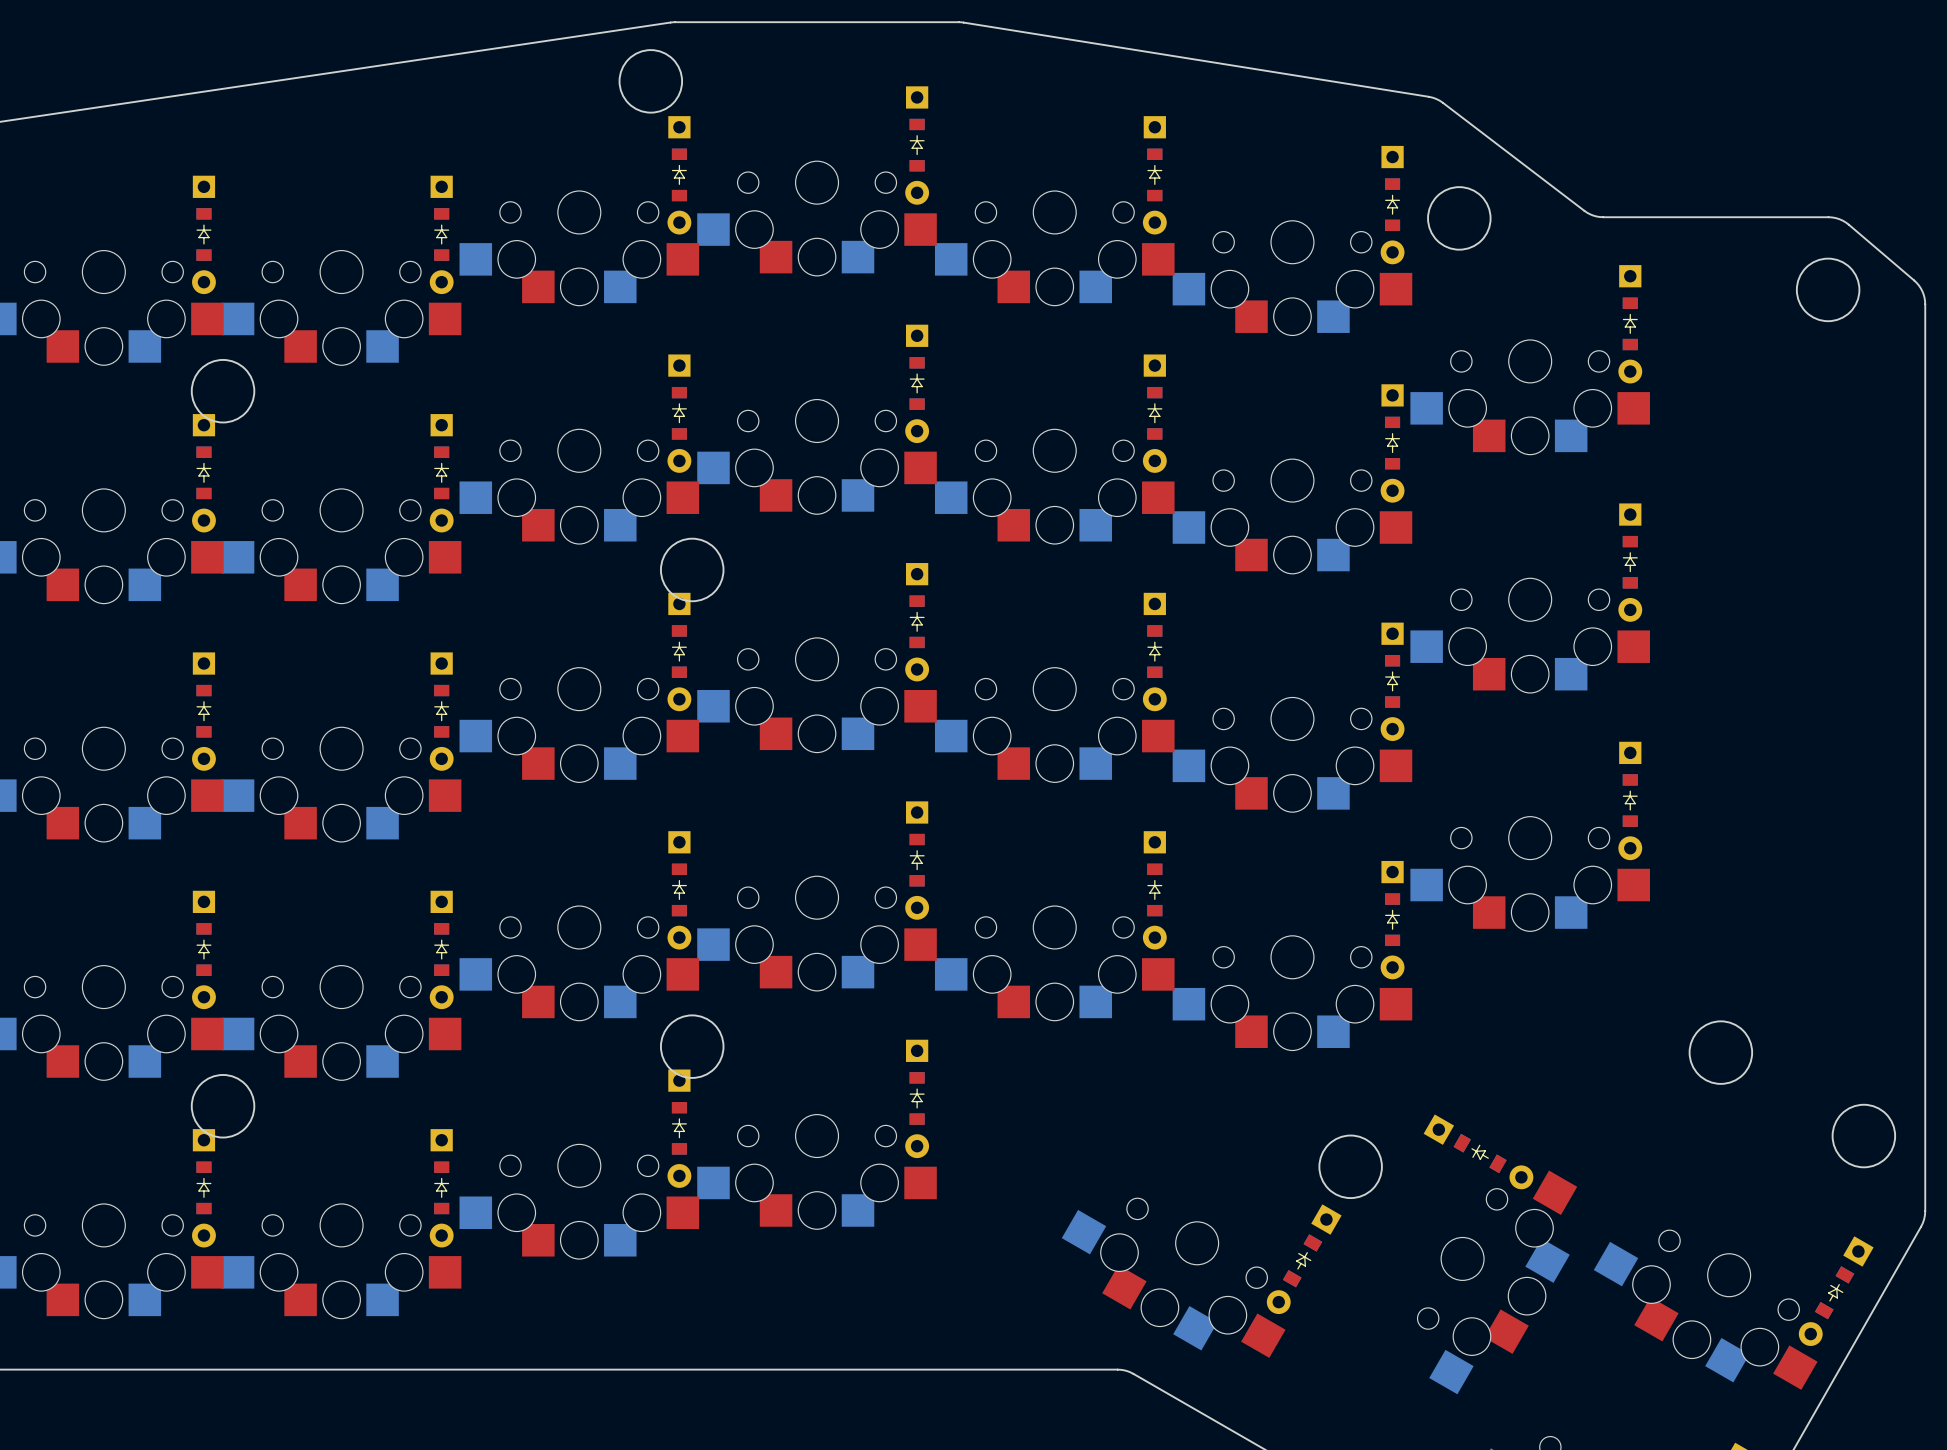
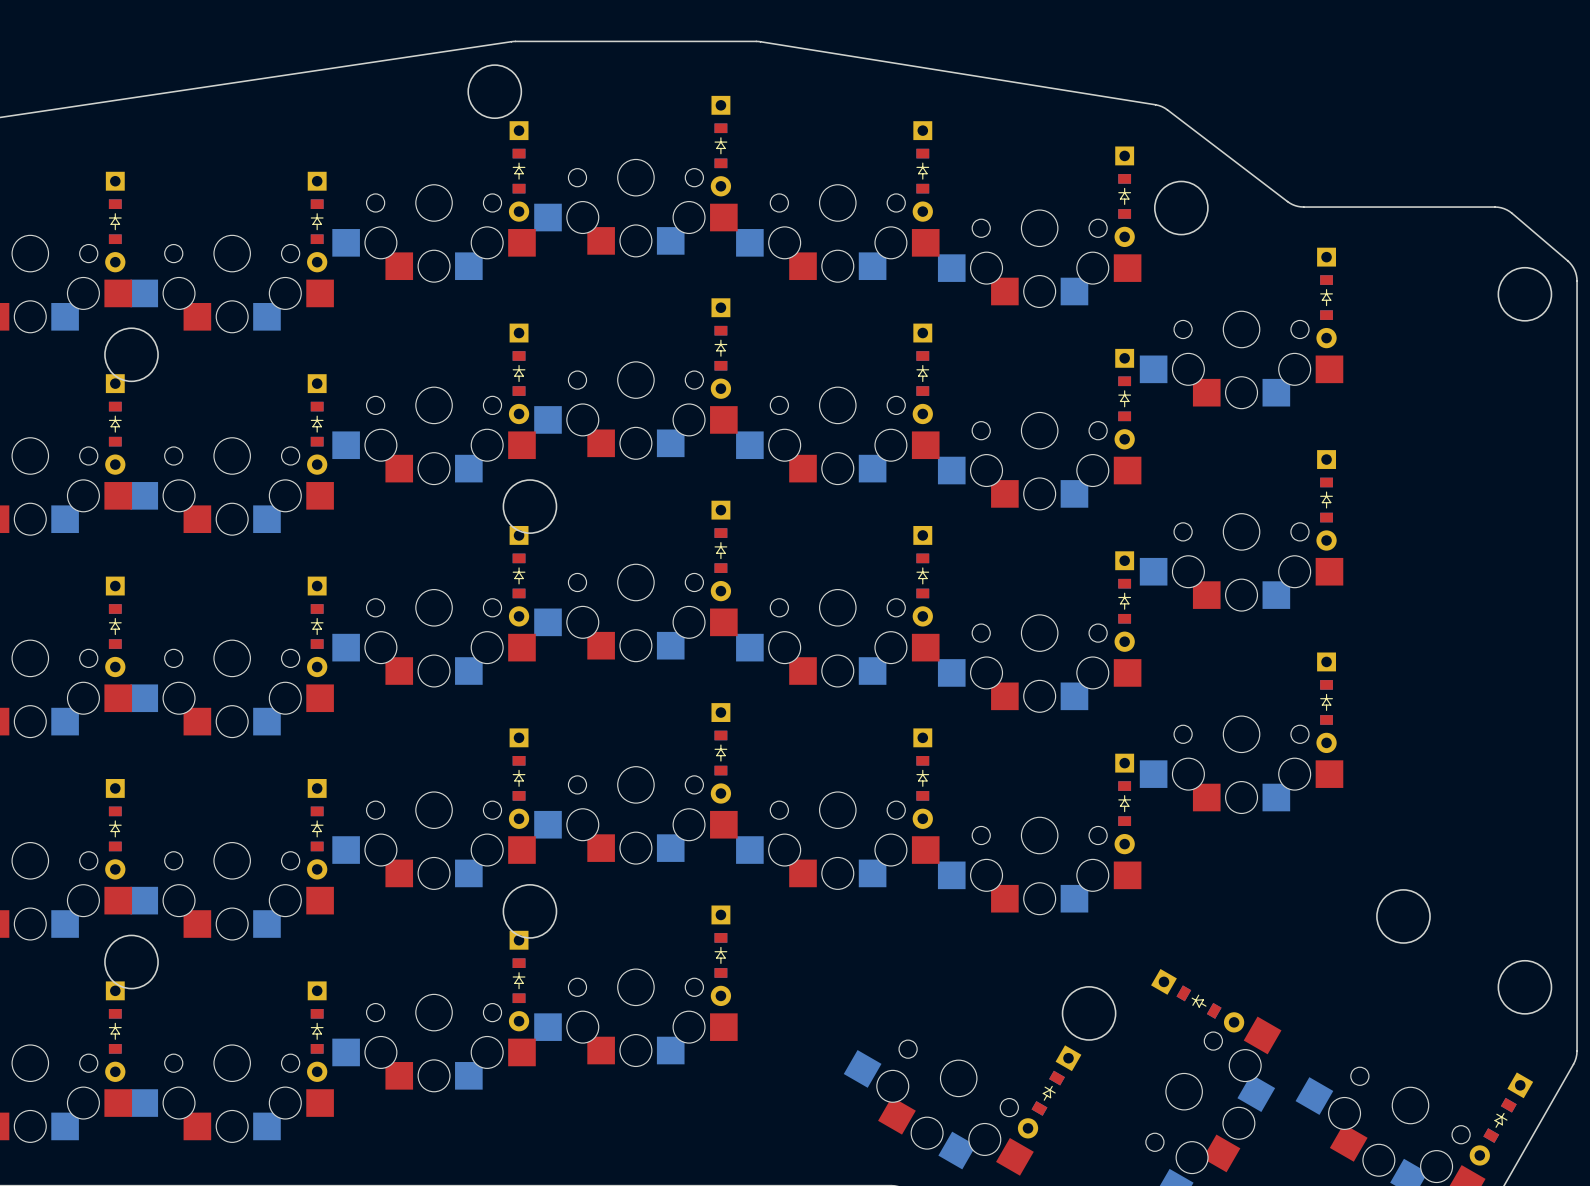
round board edge position: (1828, 289) -> (1524, 294)

